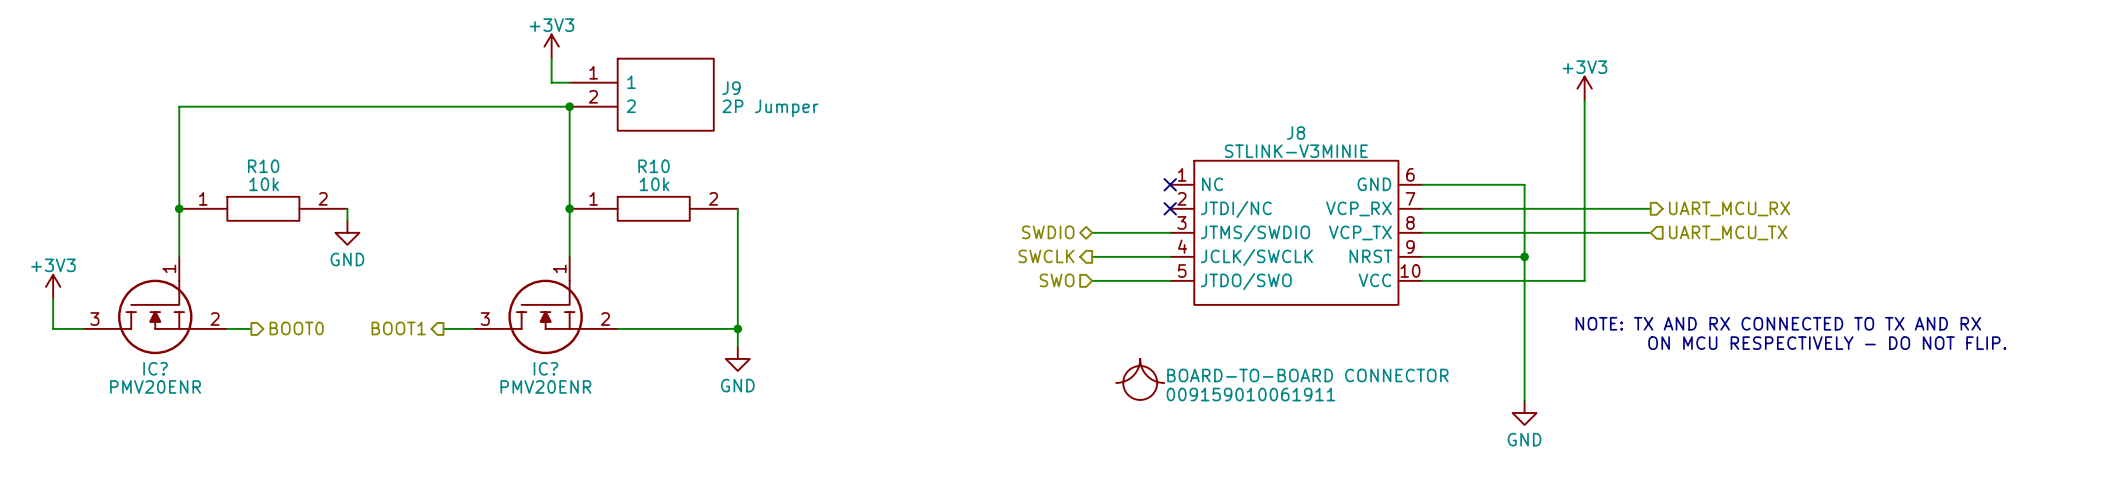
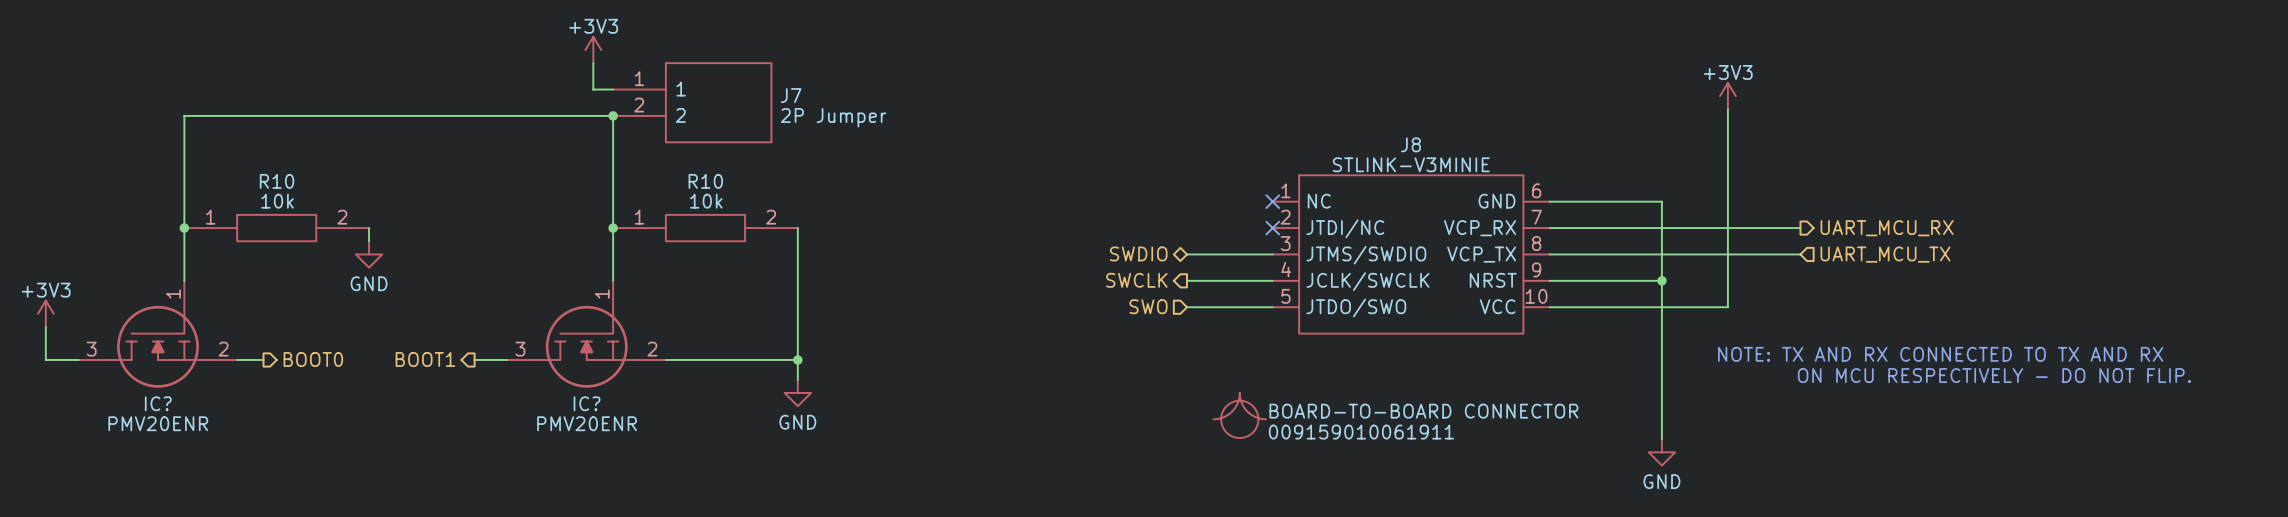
J9 name: J9 (731, 88) -> J7 (791, 95)

